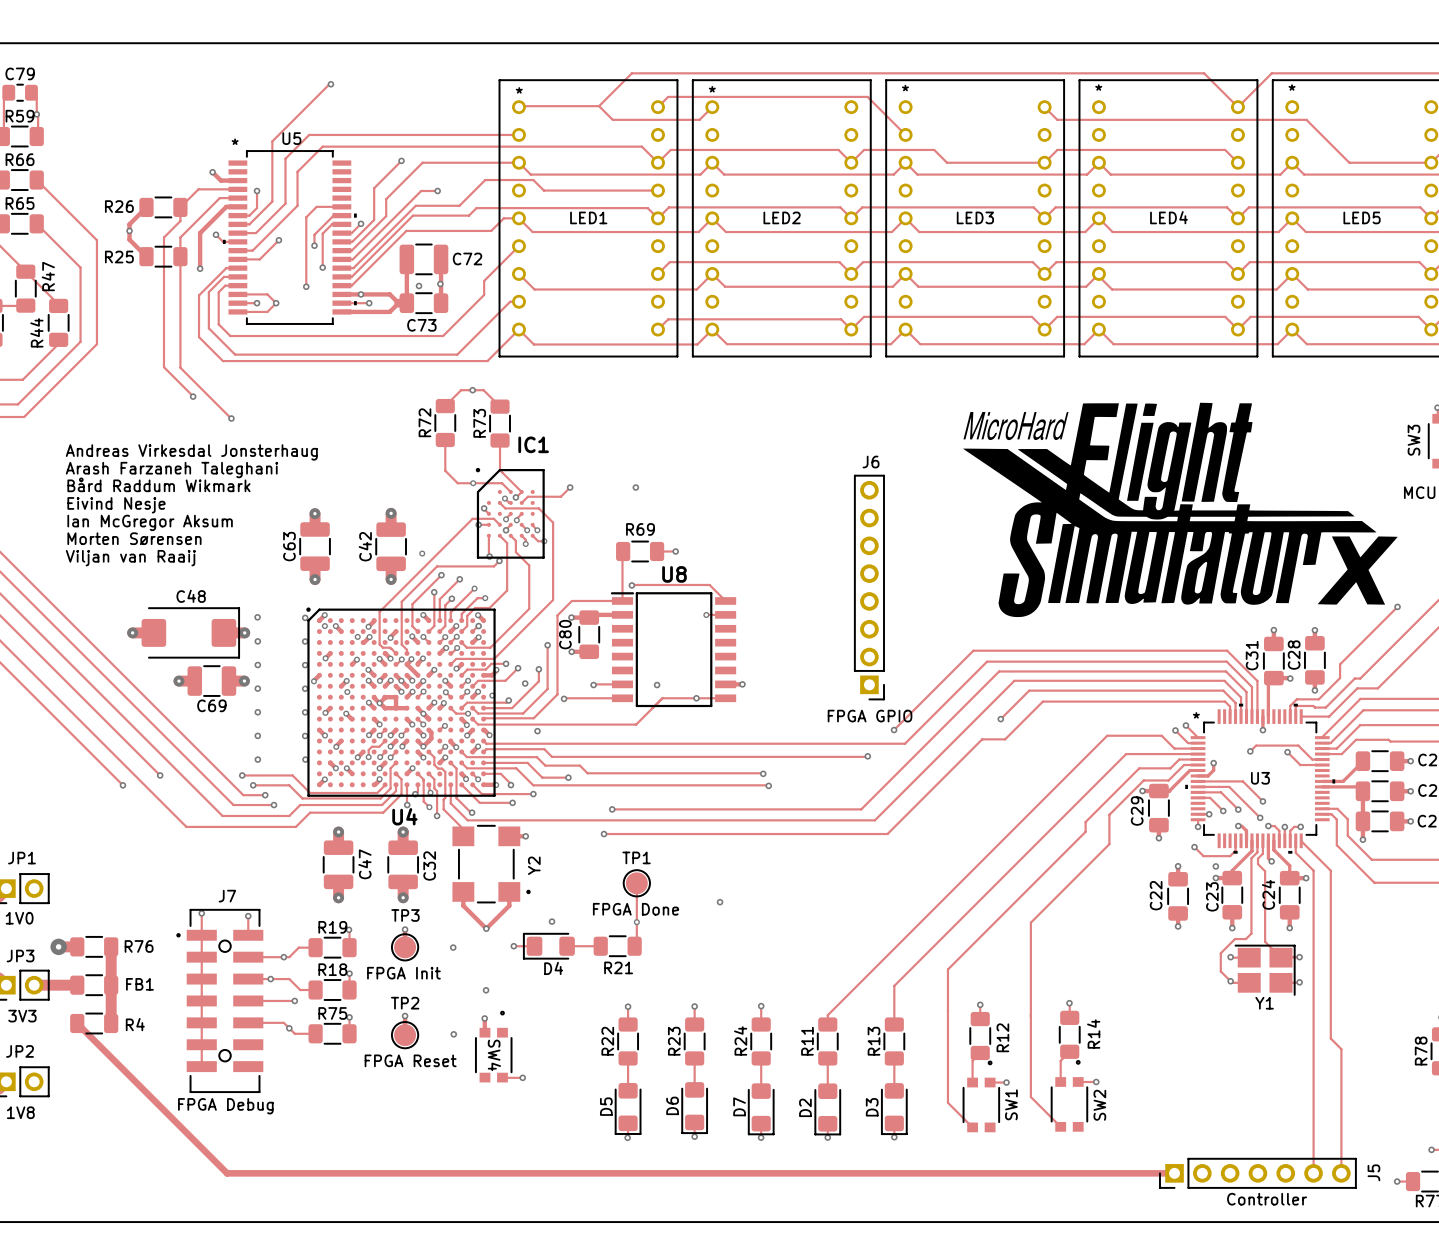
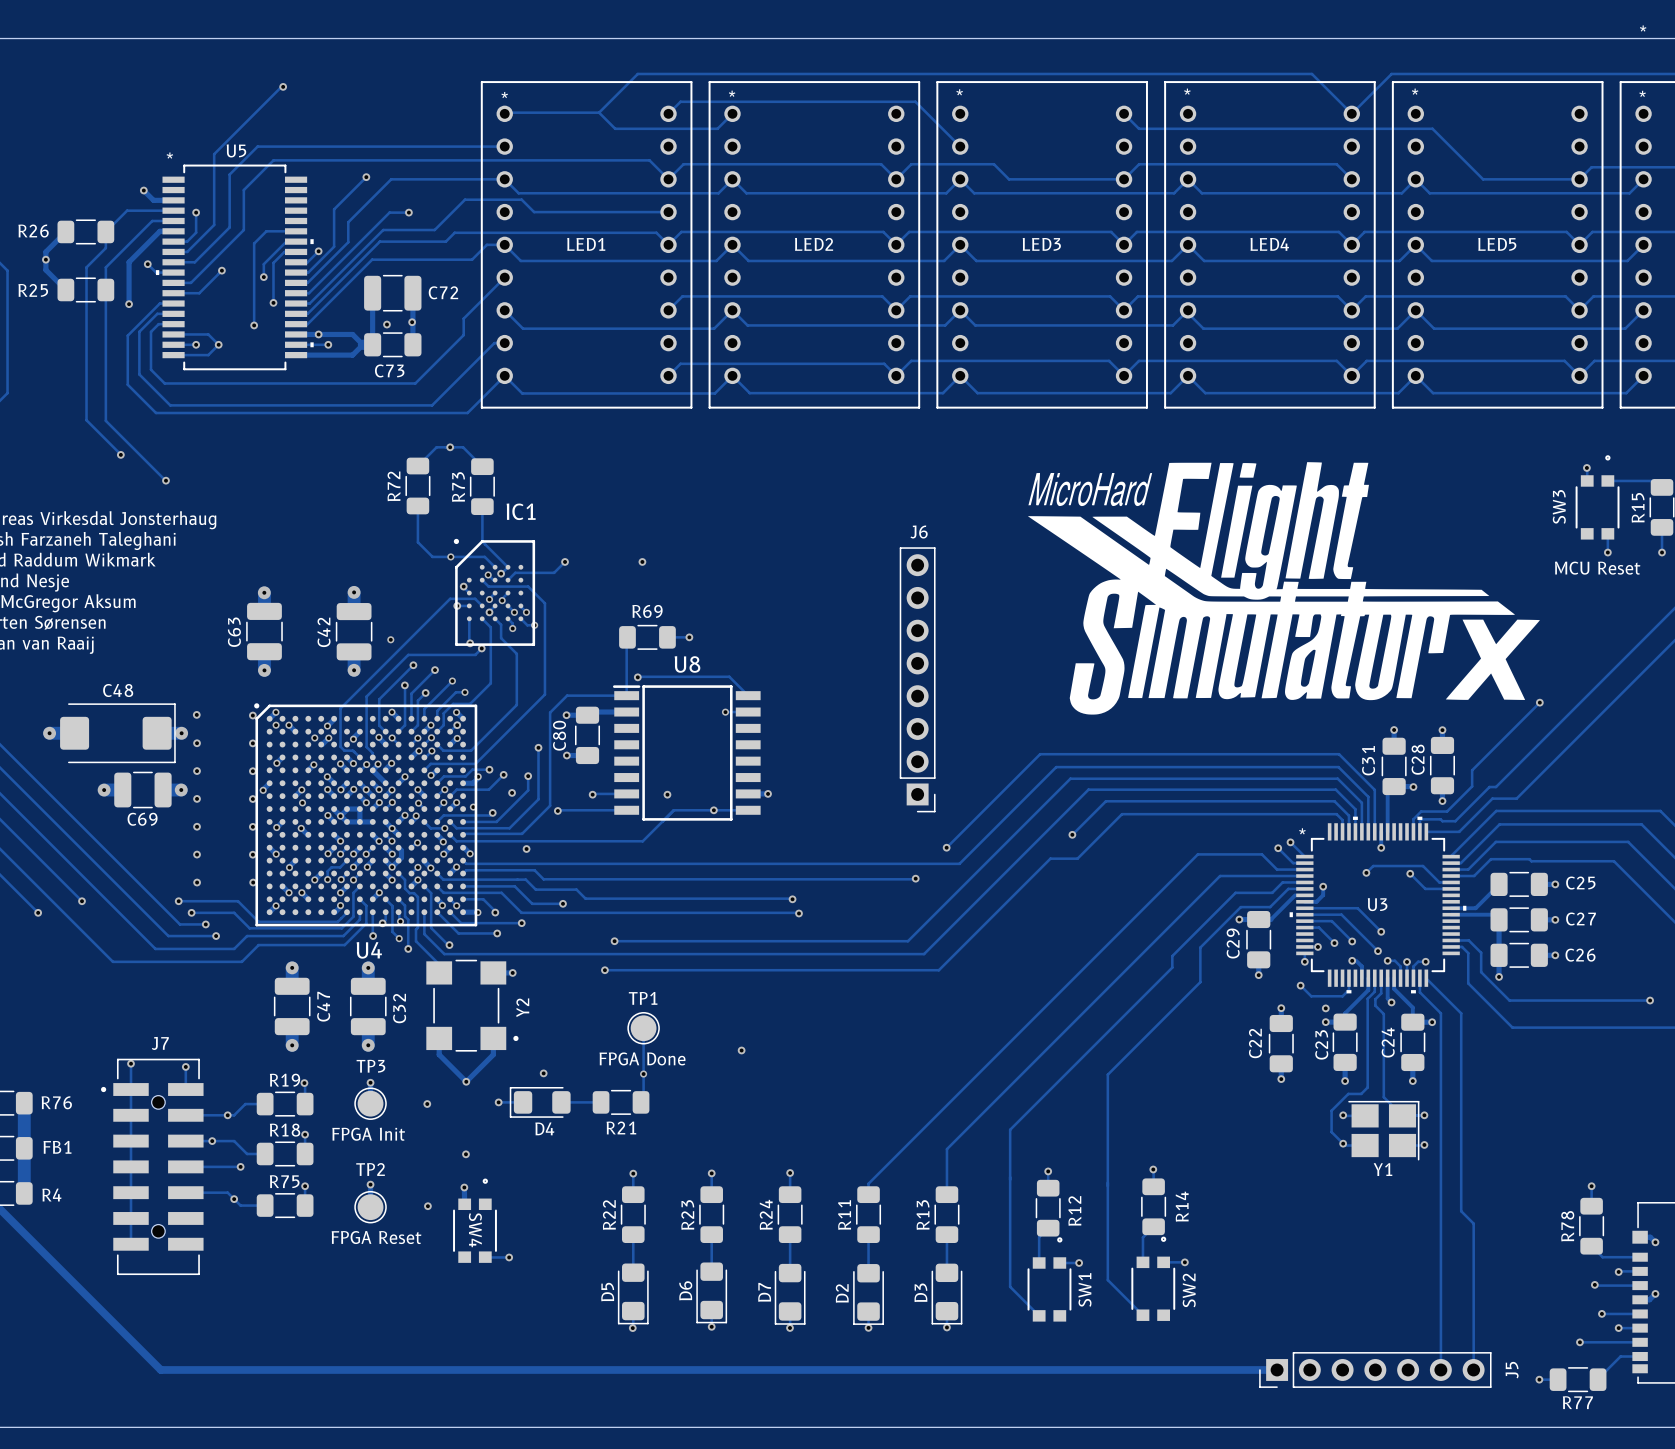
J6 text: FPGA GPIO (870, 716) -> none
J7 text: FPGA Debug (225, 1106) -> none
J5 text: Controller (1267, 1199) -> none

